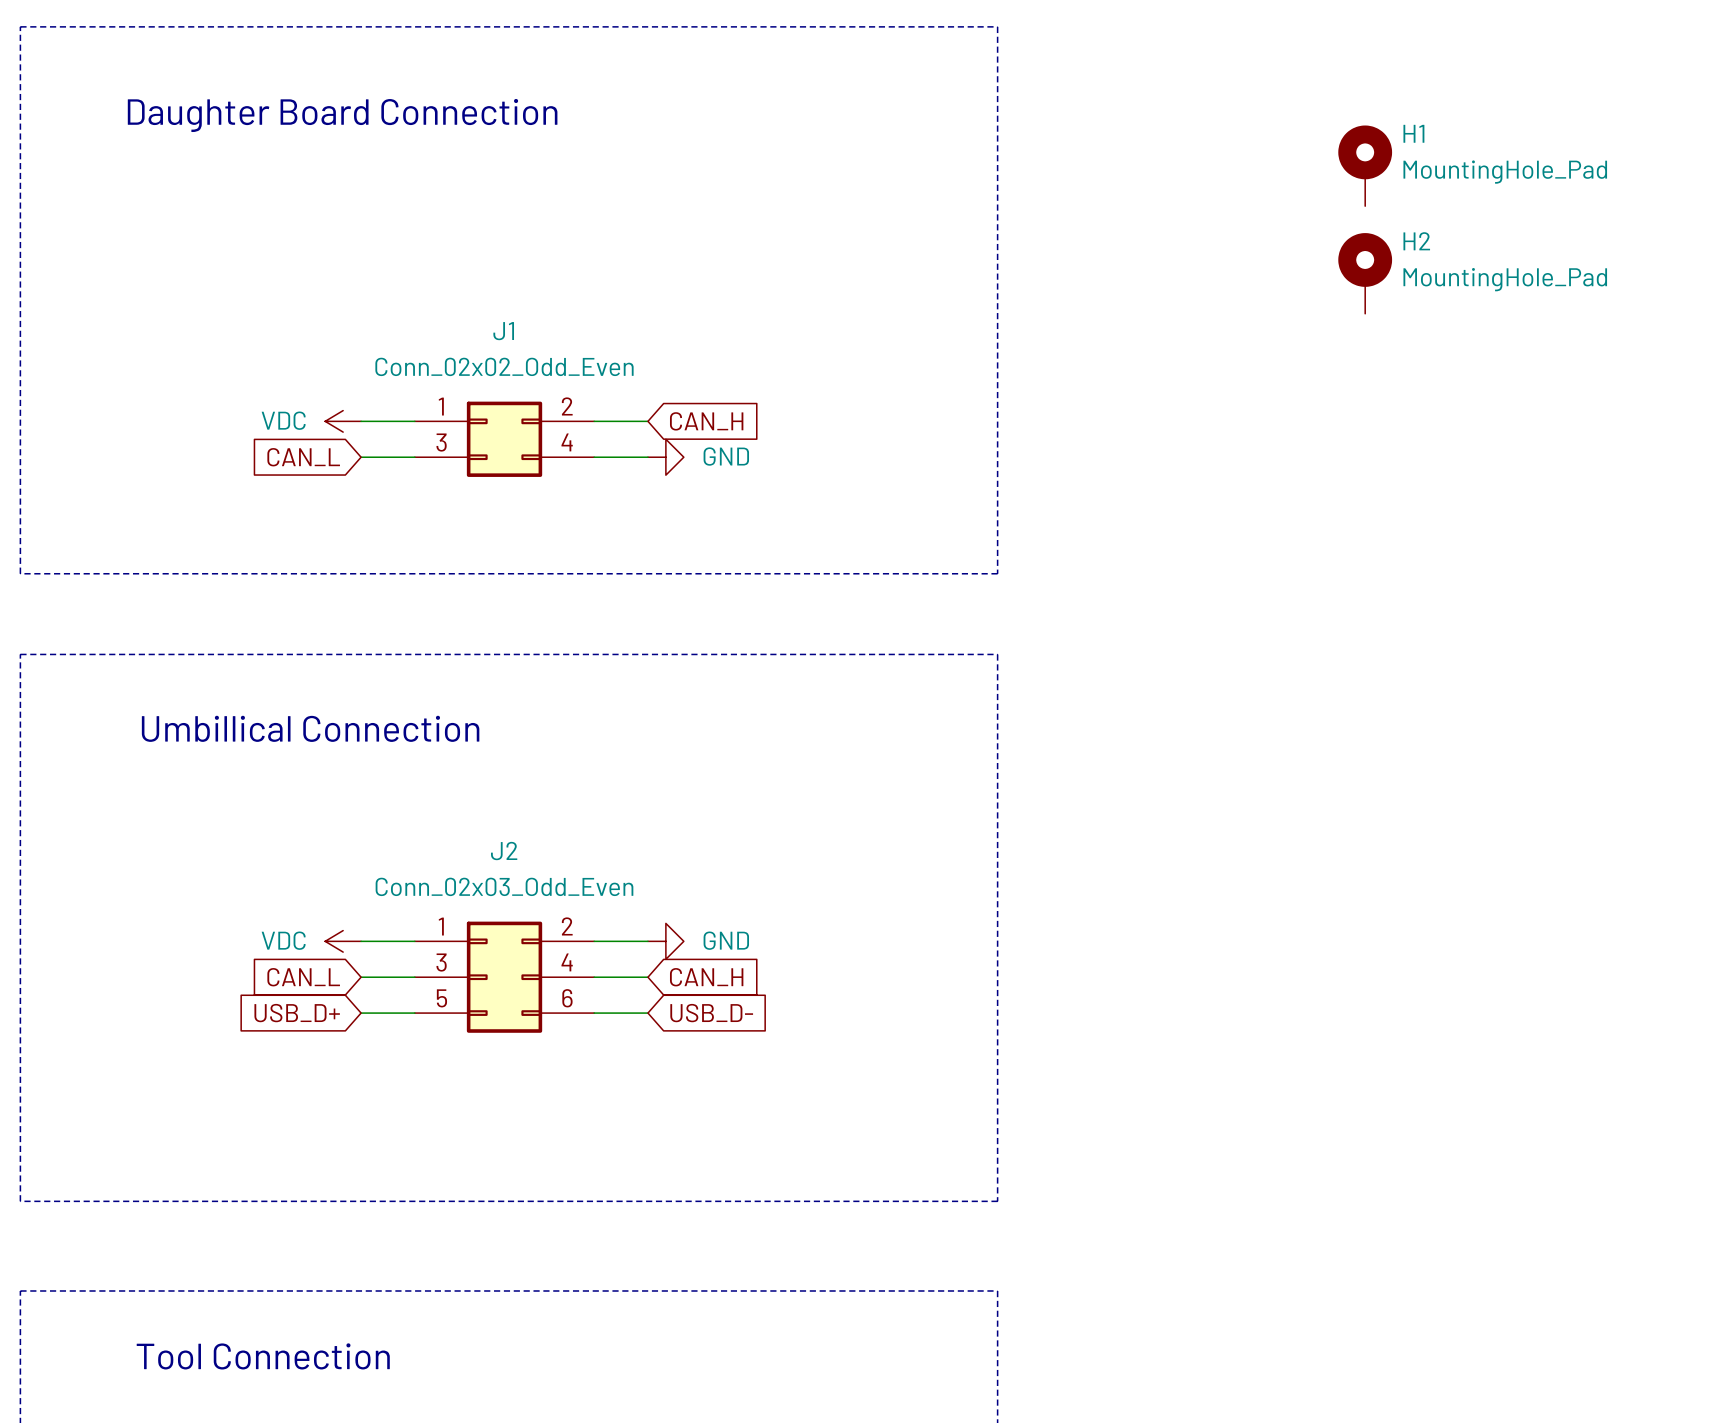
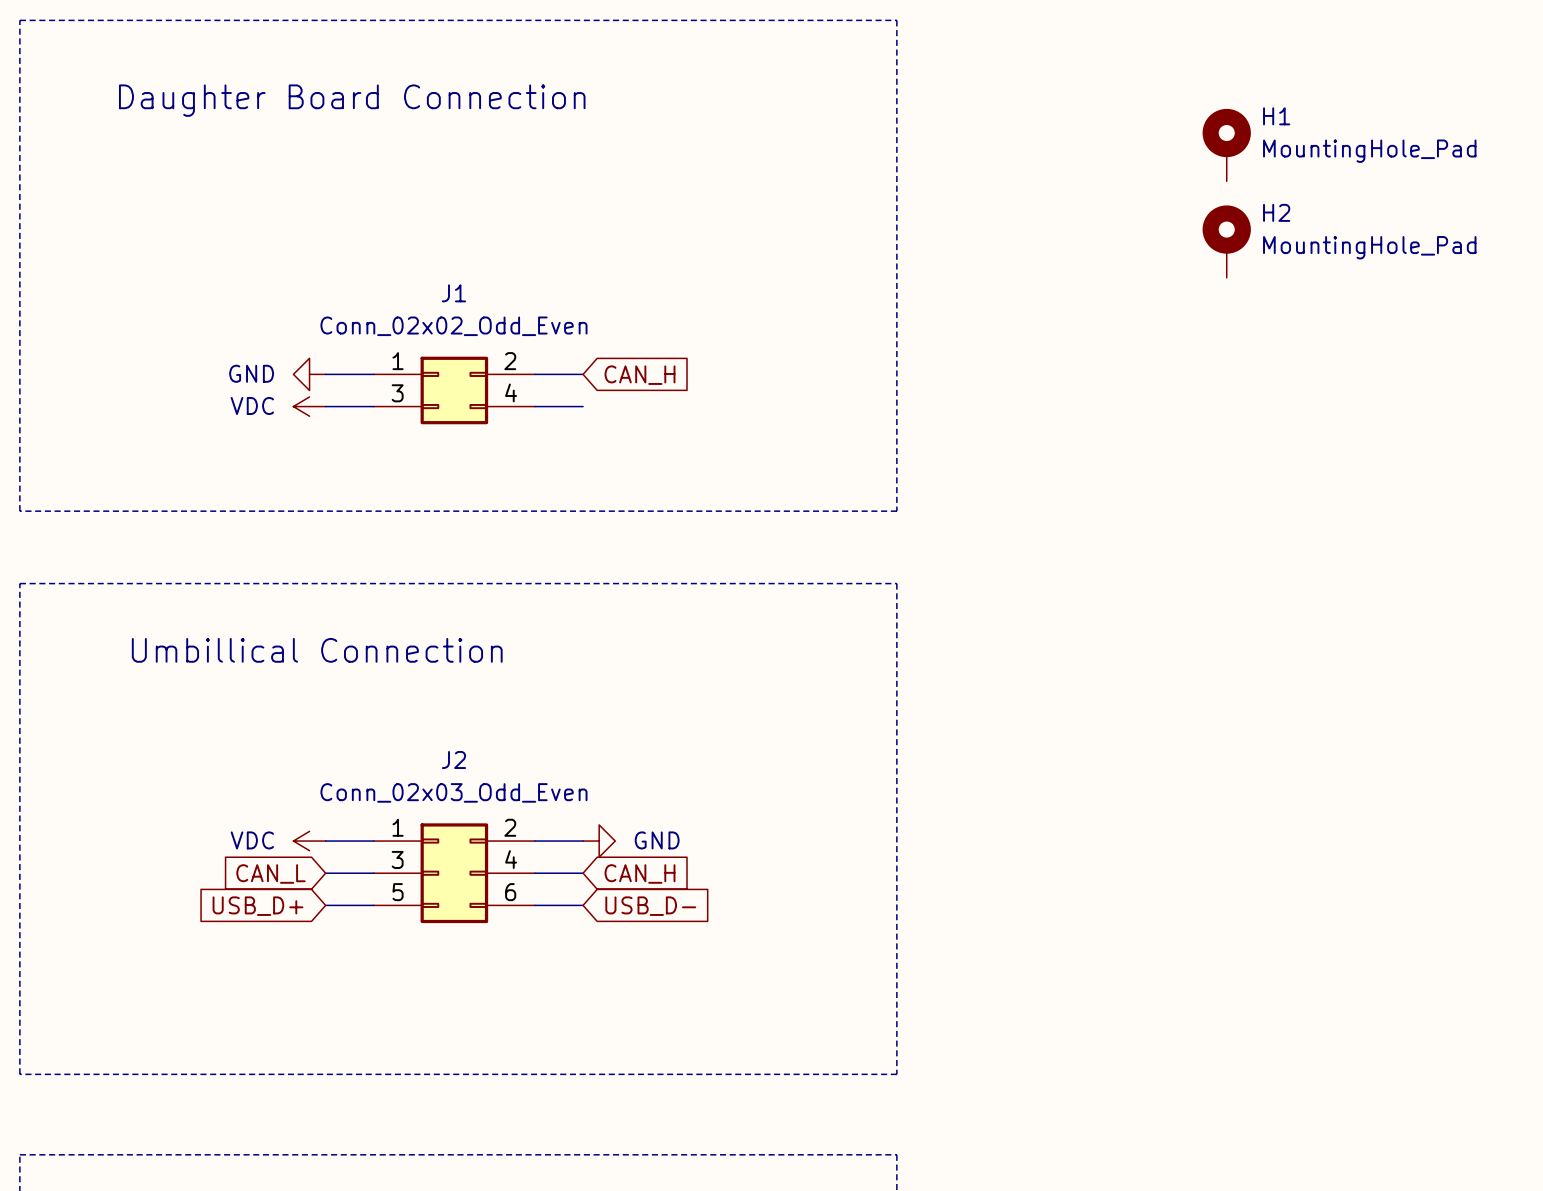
power symbol: VDC (343, 421) -> GND (309, 374)
global label: CAN_L (303, 457) -> none
power symbol: none -> VDC (309, 406)
power symbol: GND (665, 457) -> none

